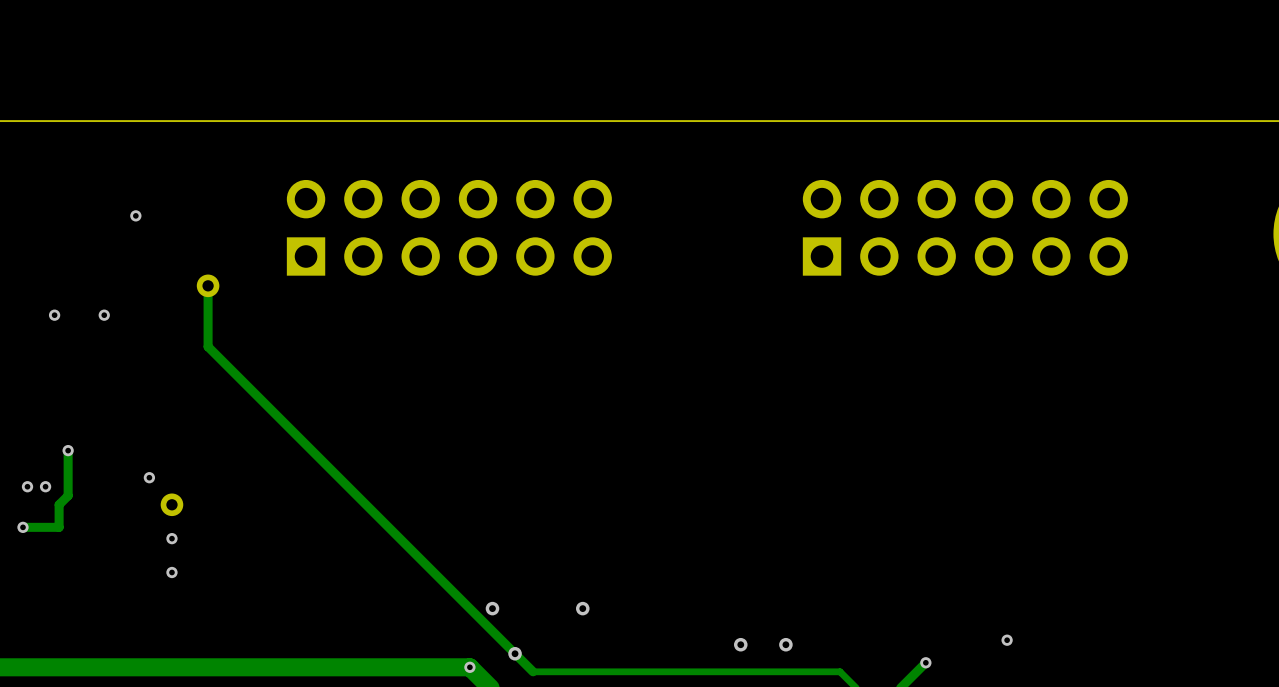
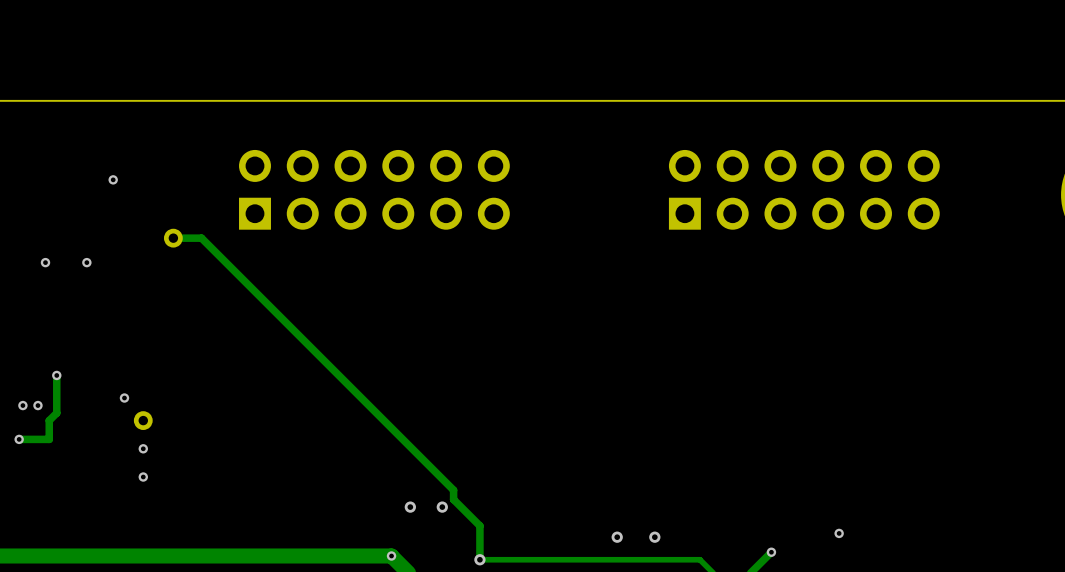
track: (208, 285) (208, 346) (533, 671) (575, 671) -> (173, 238) (201, 238) (453, 490) (453, 499) (479, 525) (479, 559)
via: none -> (442, 507)
via: (582, 608) -> none
via: (515, 653) -> none
via: none -> (479, 559)

